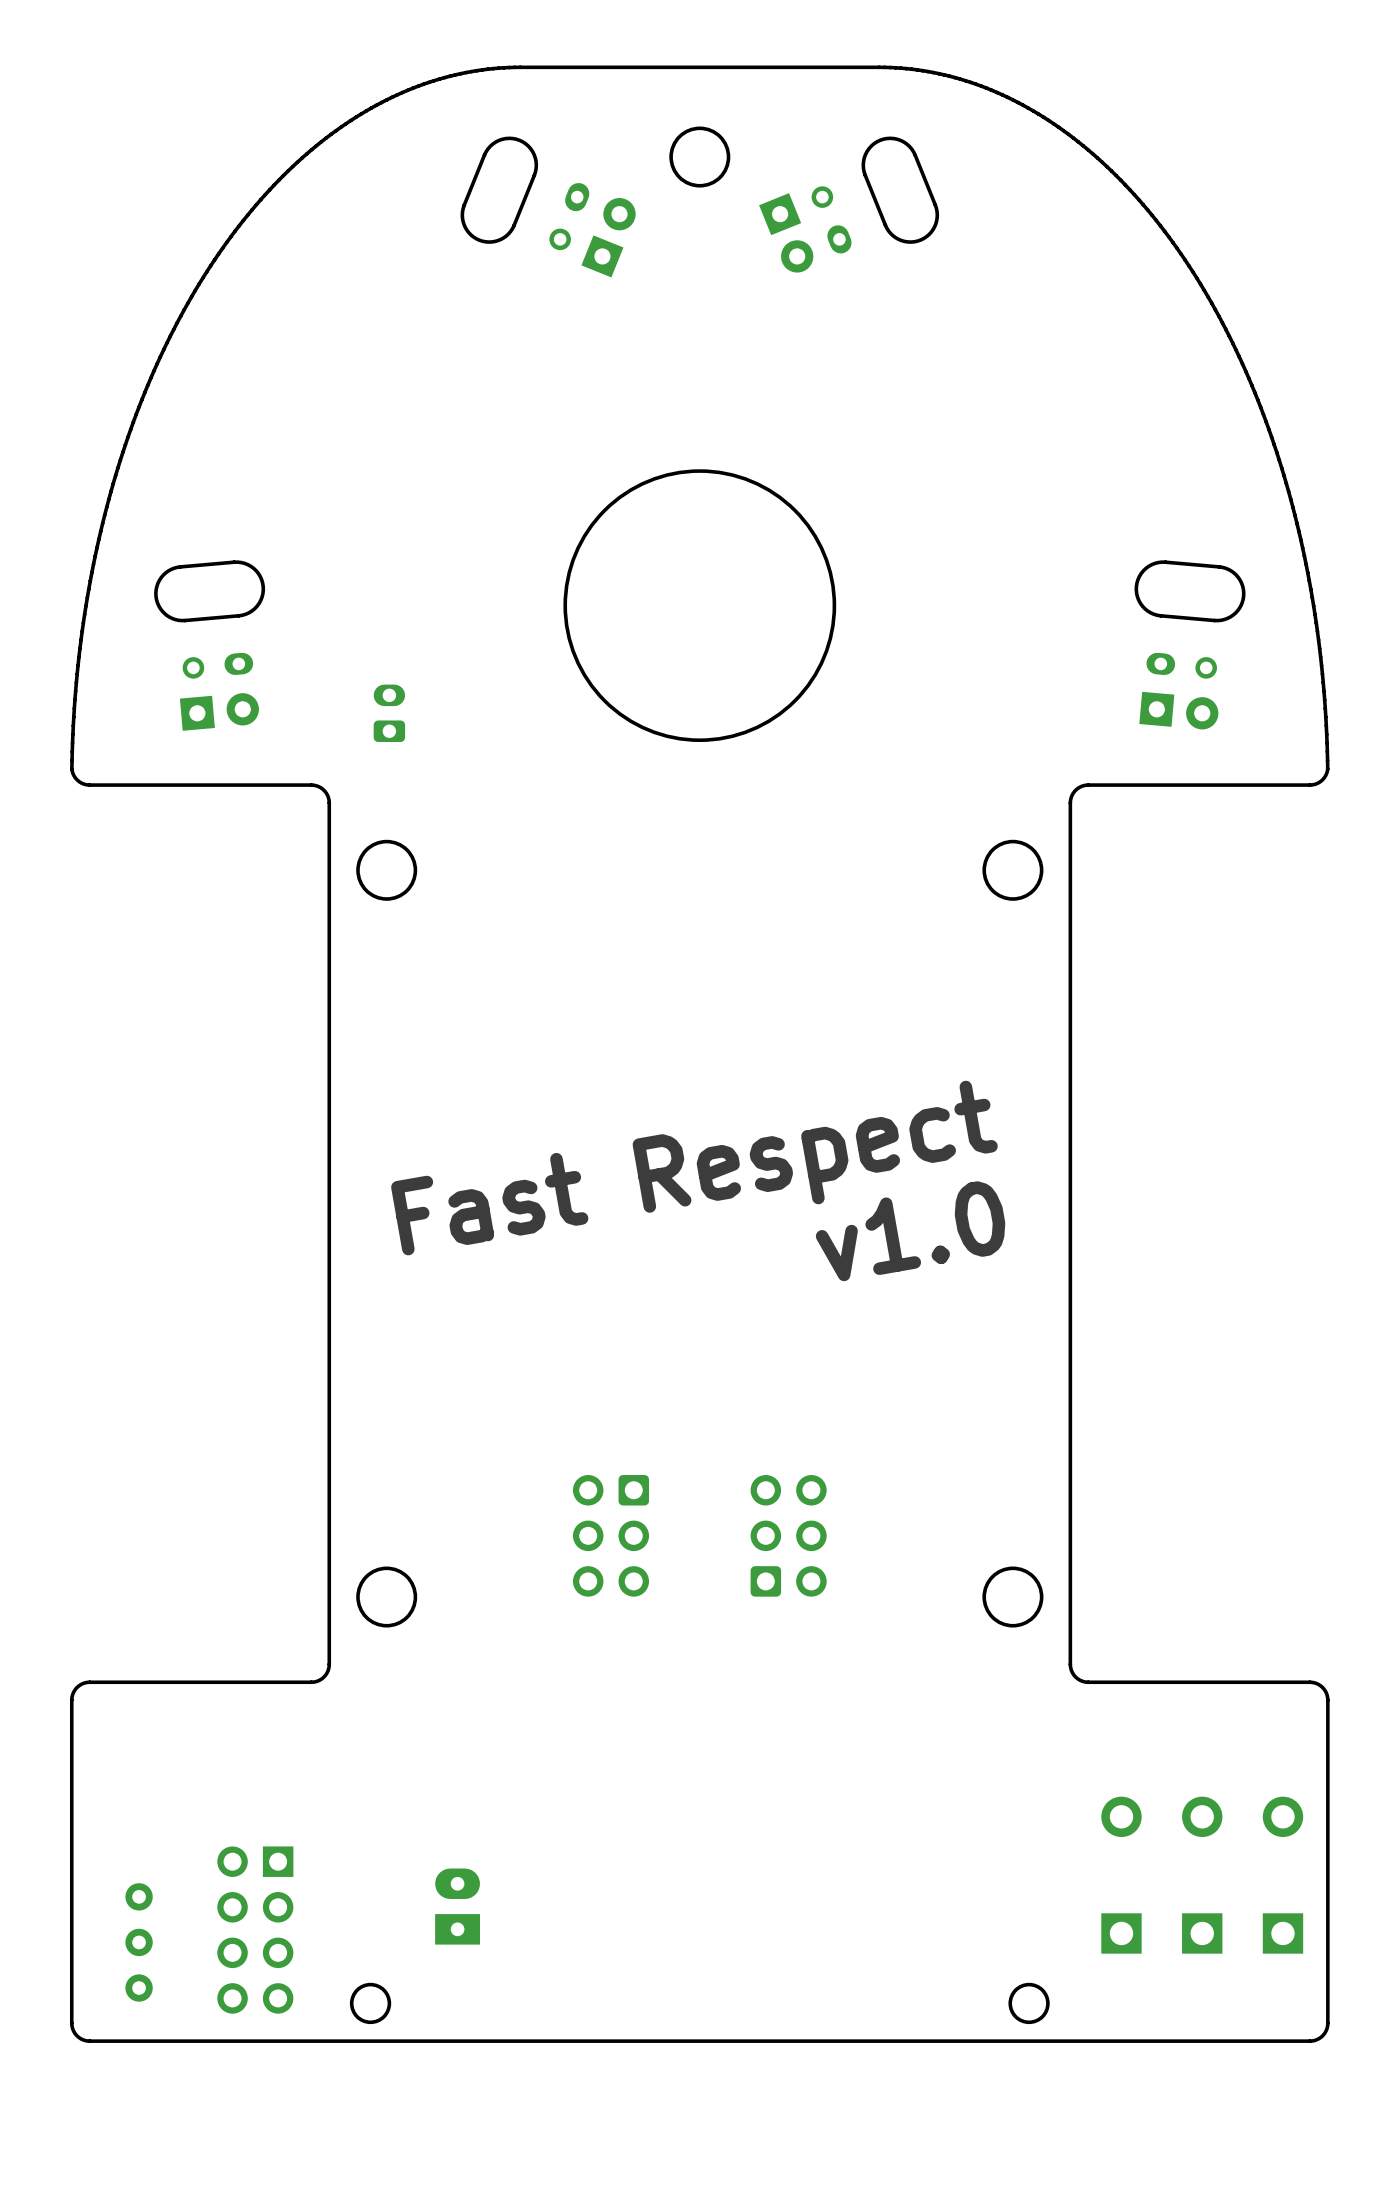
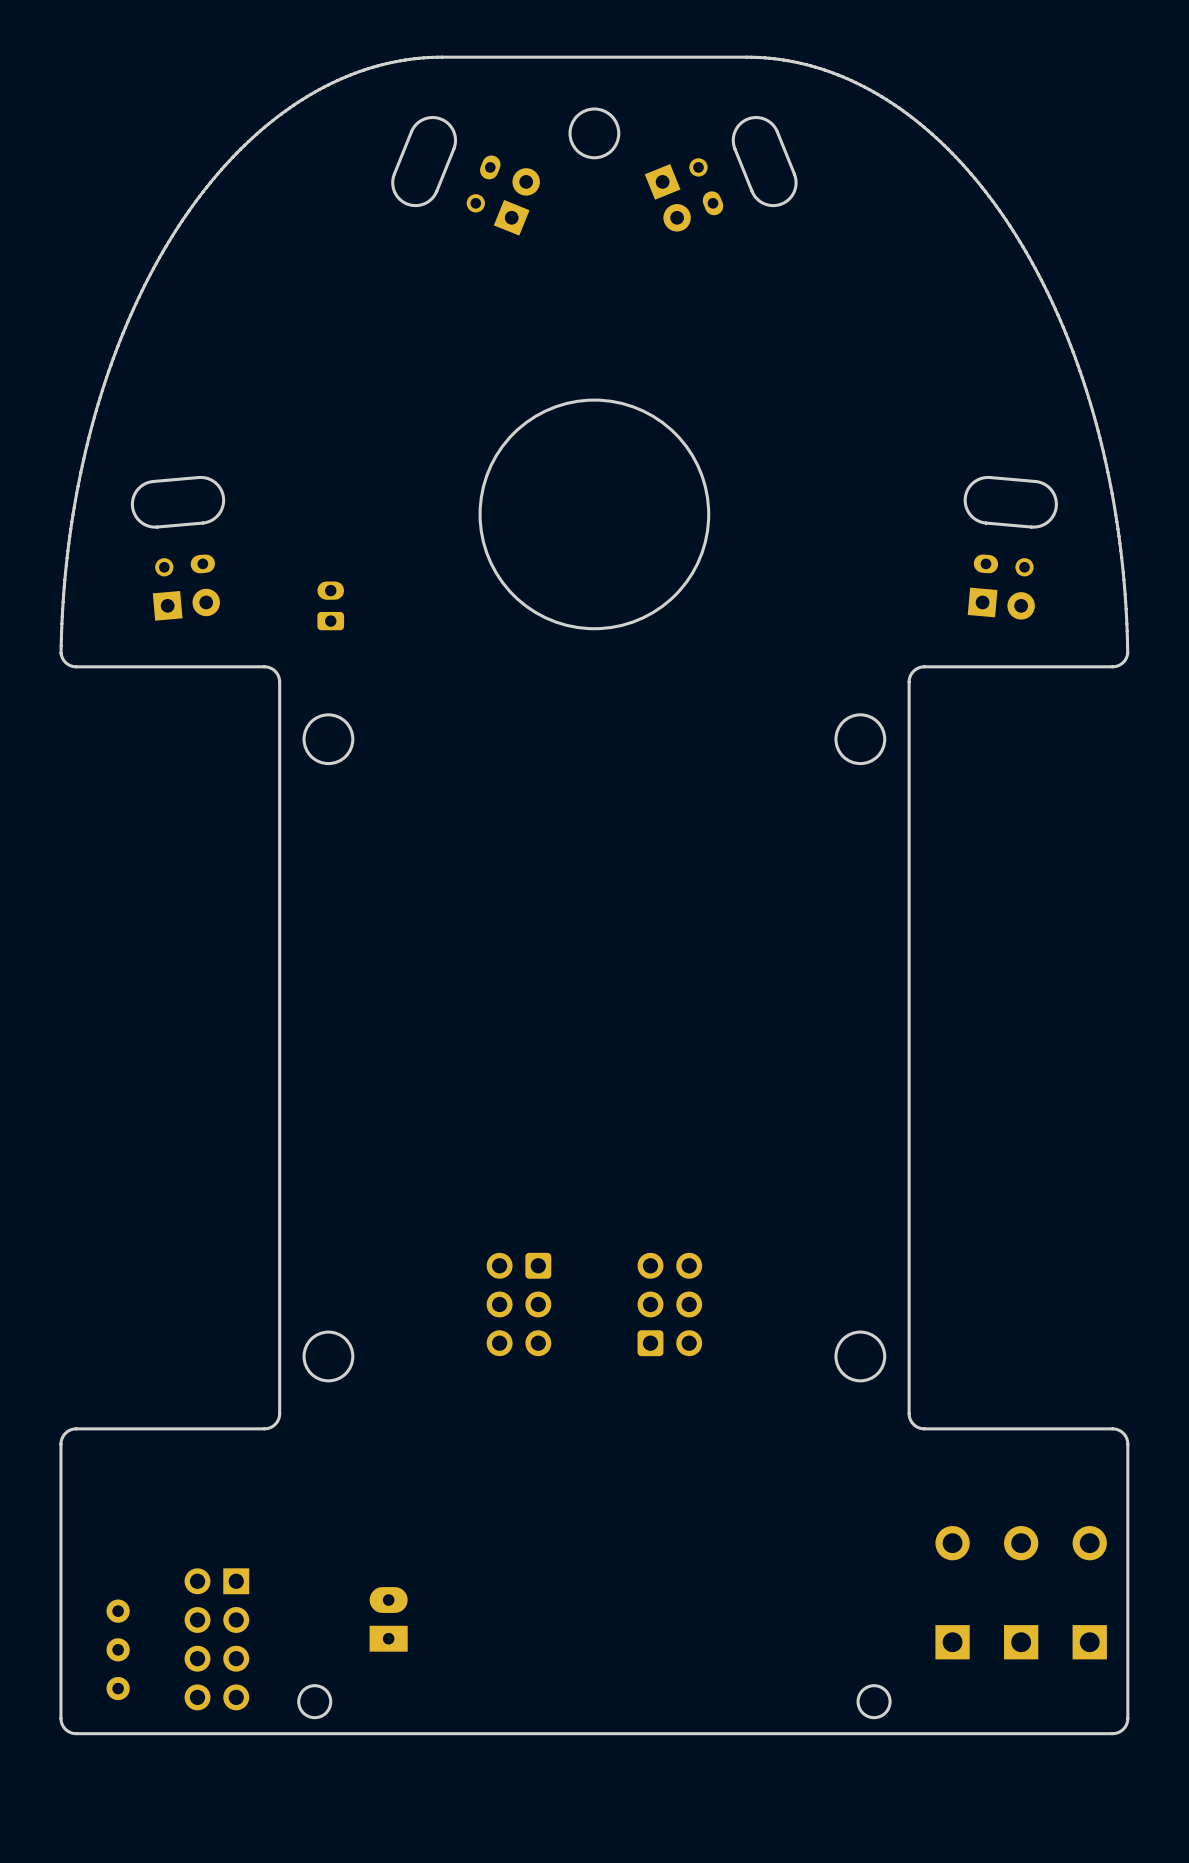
text: Fast Respect (694, 1168) -> none
text: v1.0 (910, 1231) -> none

